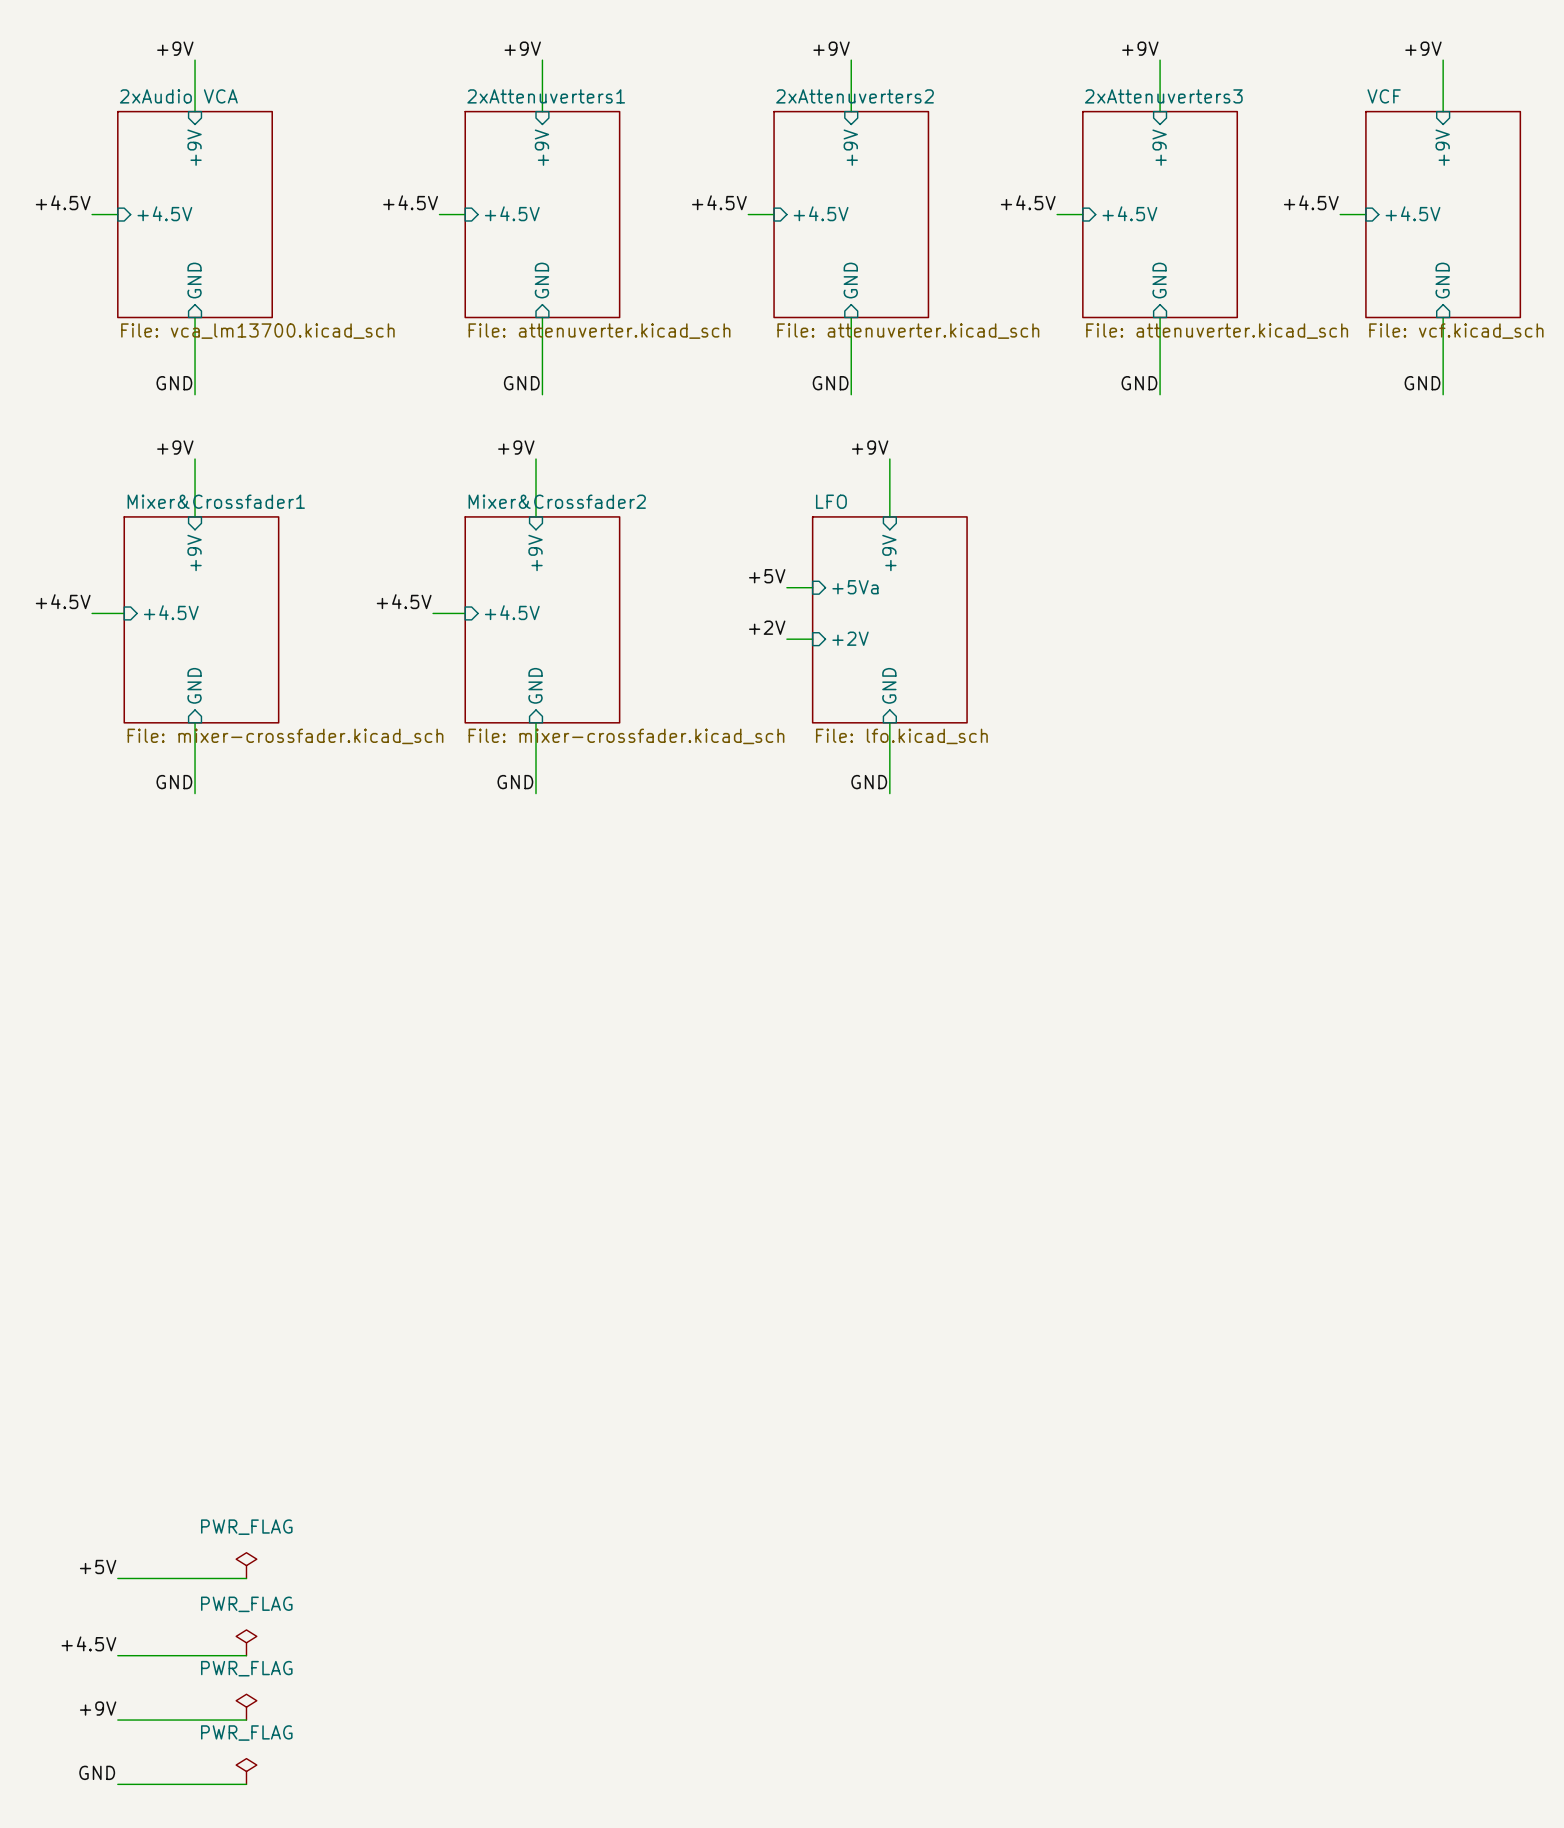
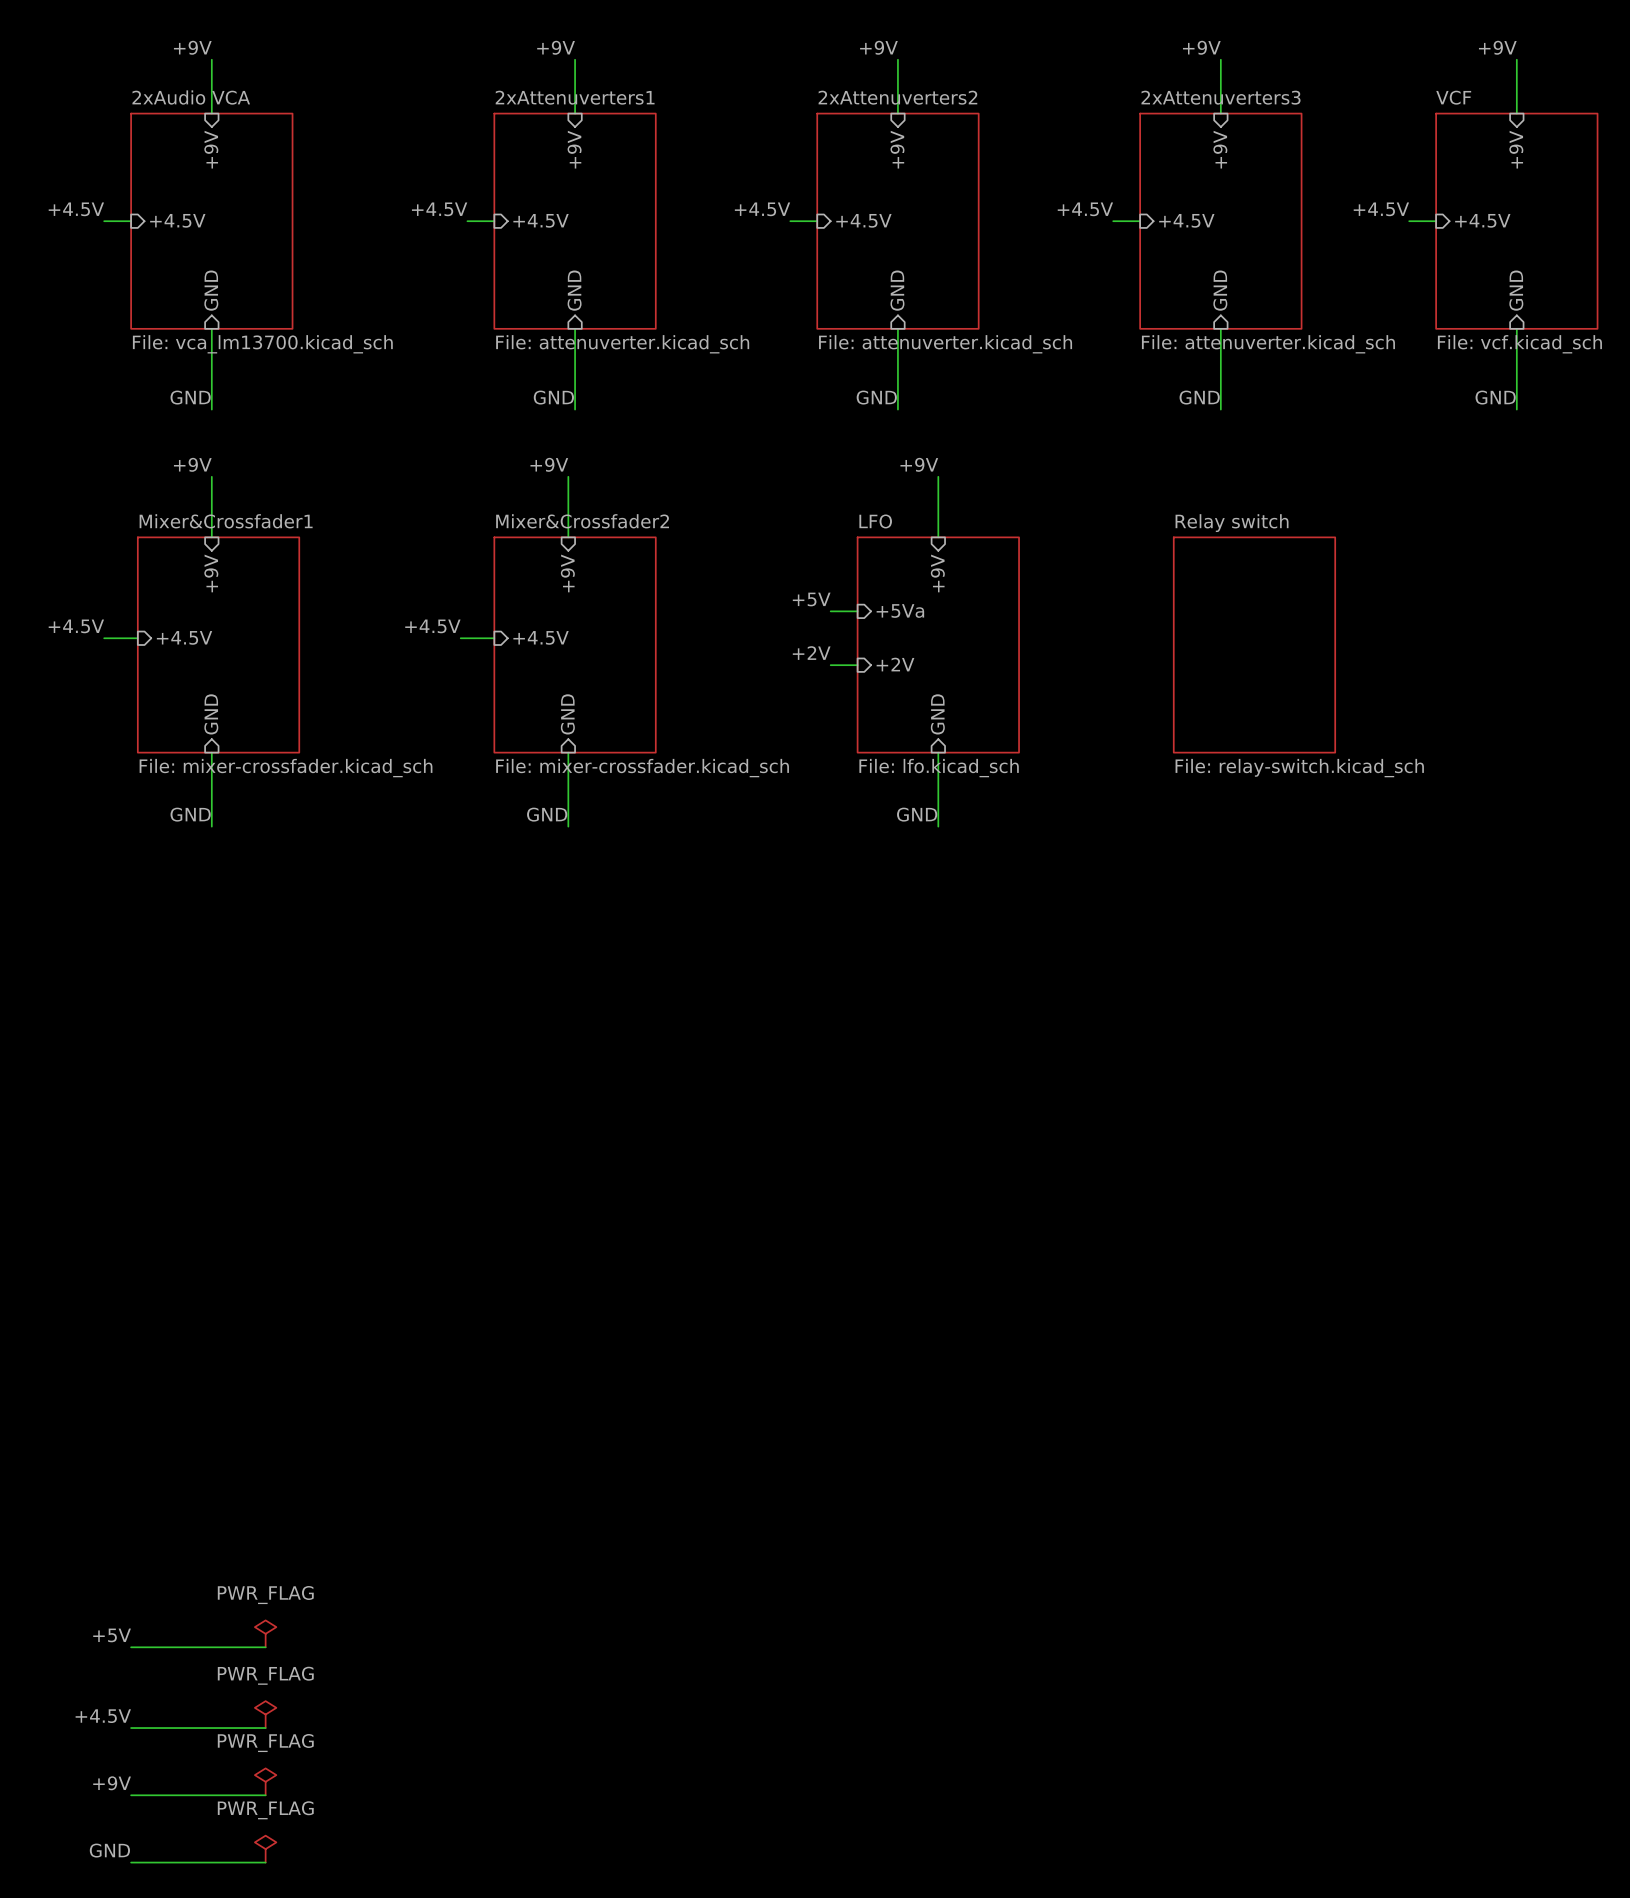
sheet Relay switch: none -> File: relay-switch.kicad_sch (1254, 645)

